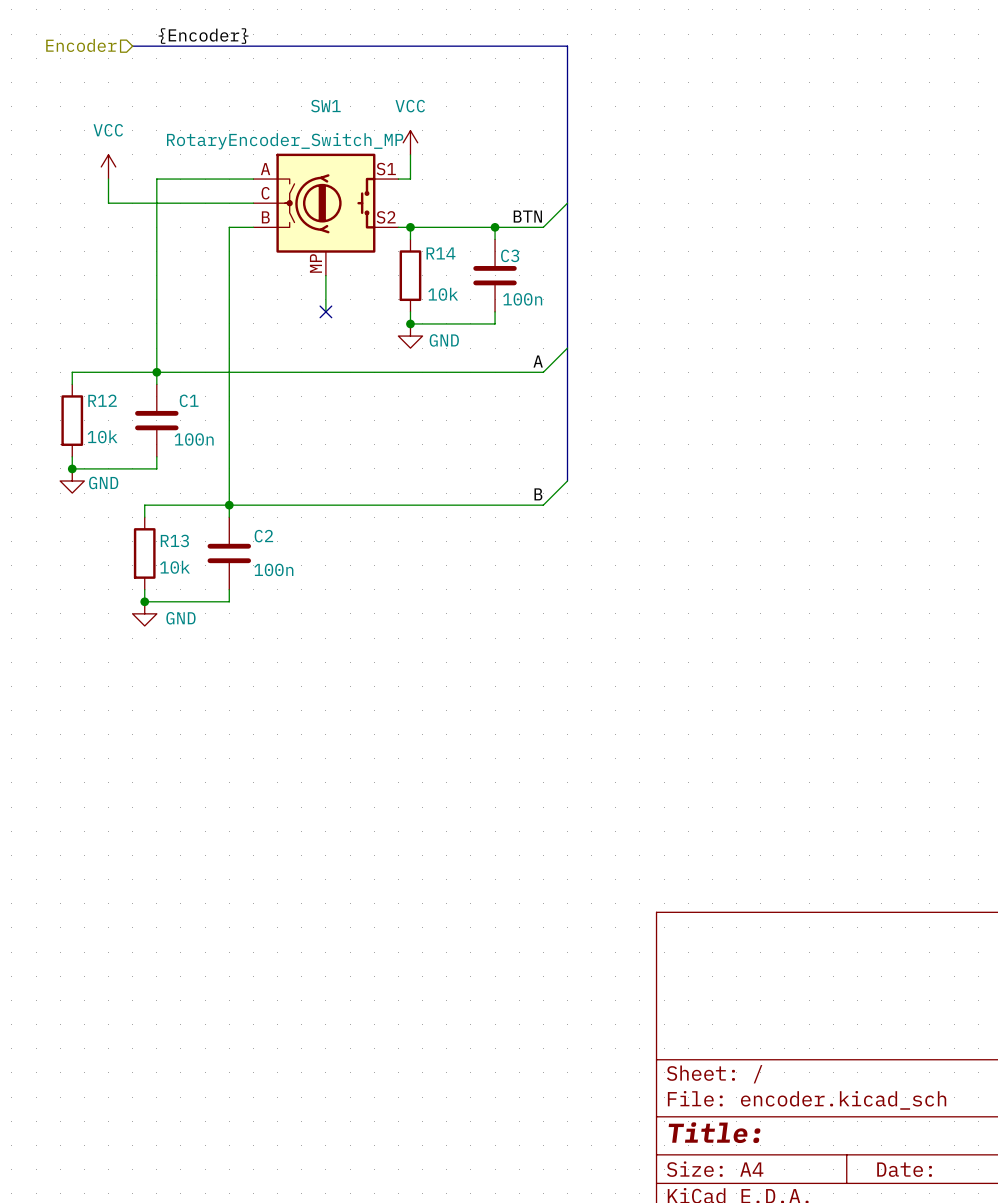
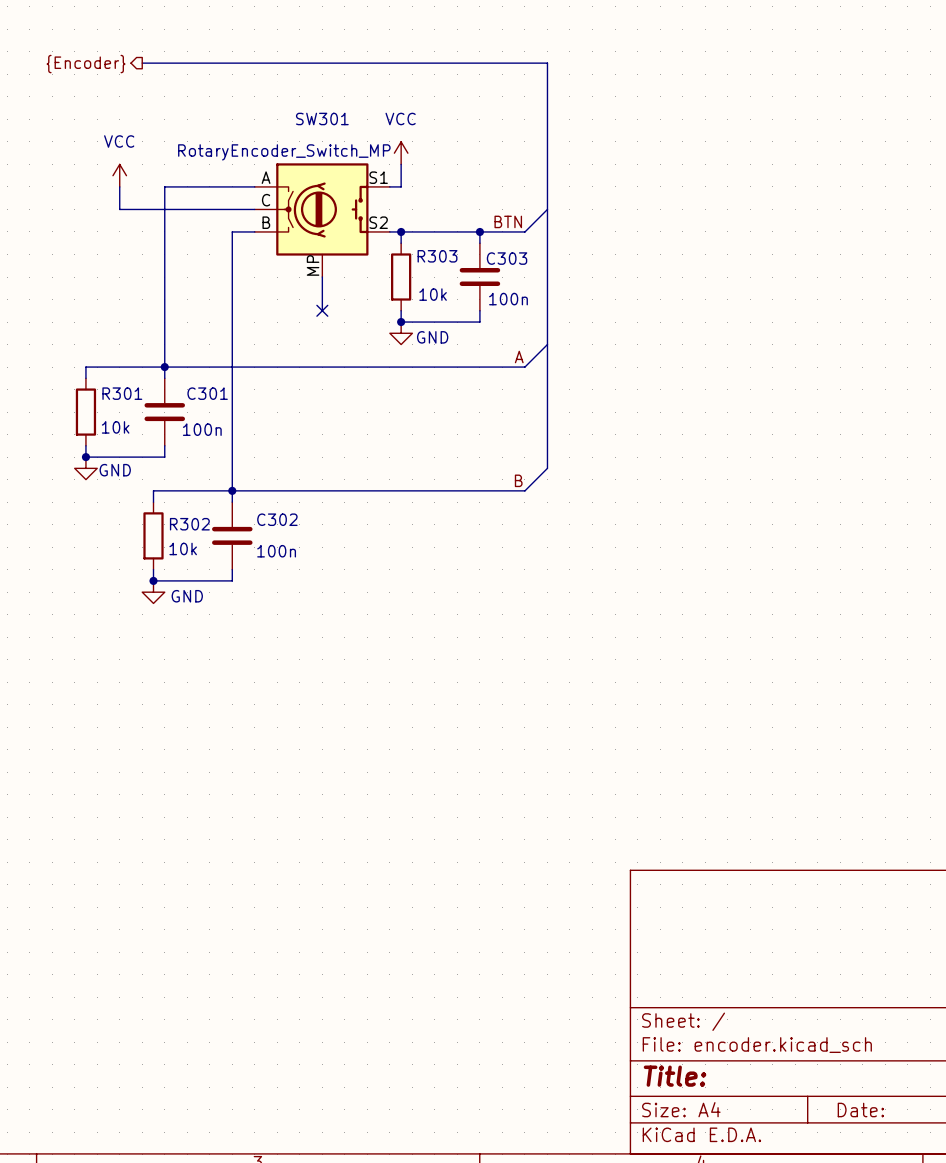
label: {Encoder} (203, 36) -> none
hierarchical label shape: input (81, 45) -> output (86, 64)
hierarchical label: Encoder (81, 45) -> {Encoder} (86, 64)
SW1 name: SW1 (325, 106) -> SW301 (322, 118)
R14 name: R14 (440, 253) -> R303 (437, 256)
C3 name: C3 (510, 255) -> C303 (507, 258)
R12 name: R12 (102, 400) -> R301 (122, 393)
C1 name: C1 (189, 400) -> C301 (207, 393)
C2 name: C2 (263, 536) -> C302 (277, 519)
R13 name: R13 (174, 540) -> R302 (189, 524)

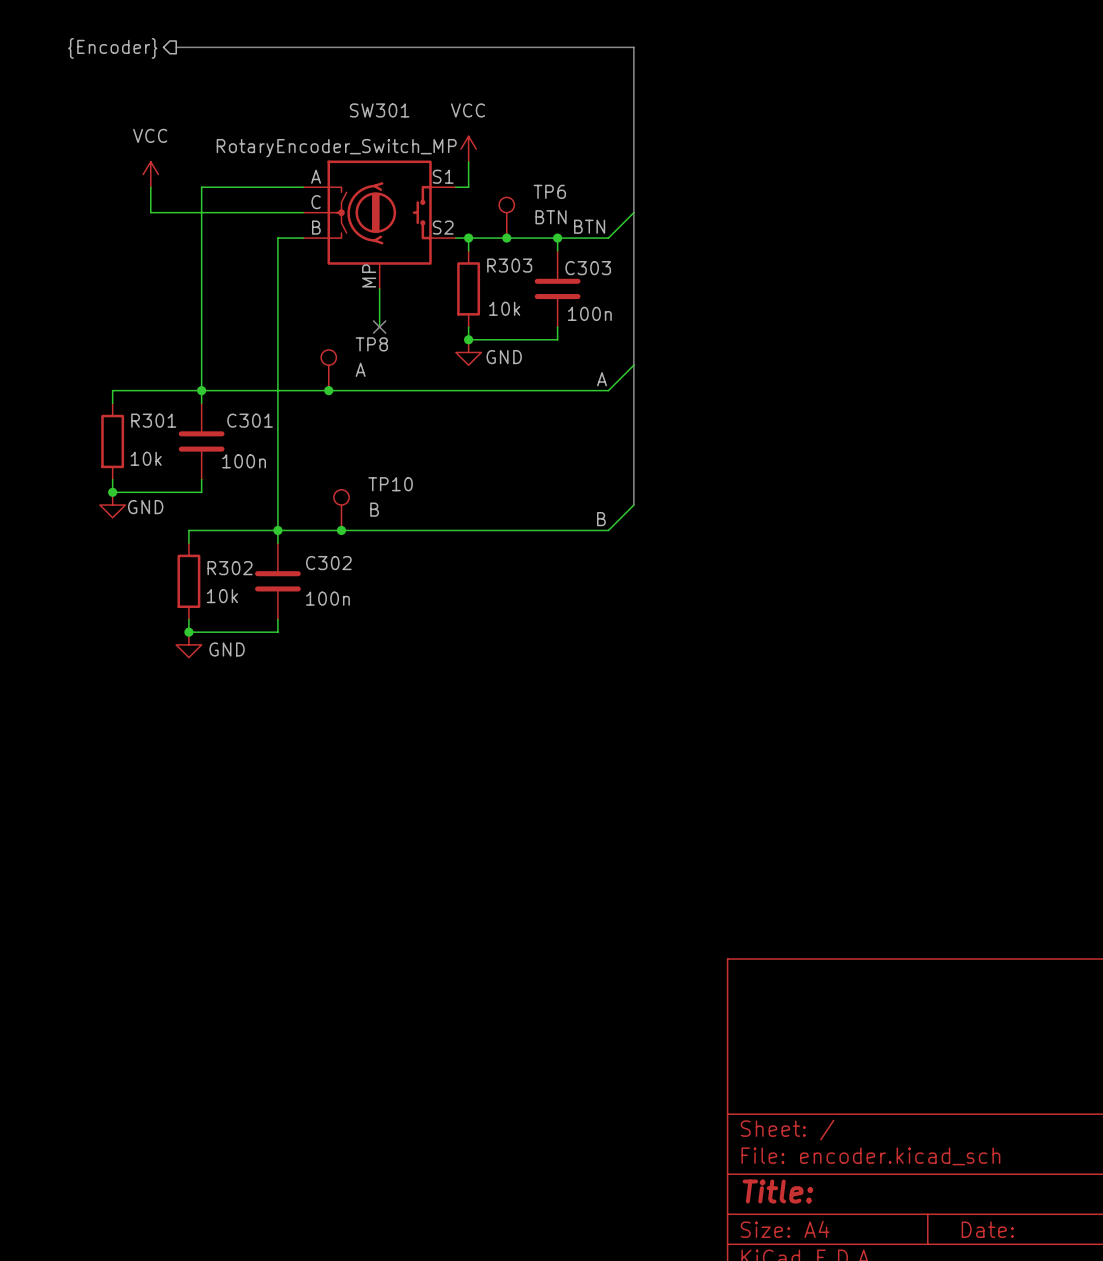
TP6: none -> BTN (506, 217)
junction: none -> (506, 238)
TP8: none -> A (328, 370)
junction: none -> (328, 390)
TP10: none -> B (341, 510)
junction: none -> (341, 530)

